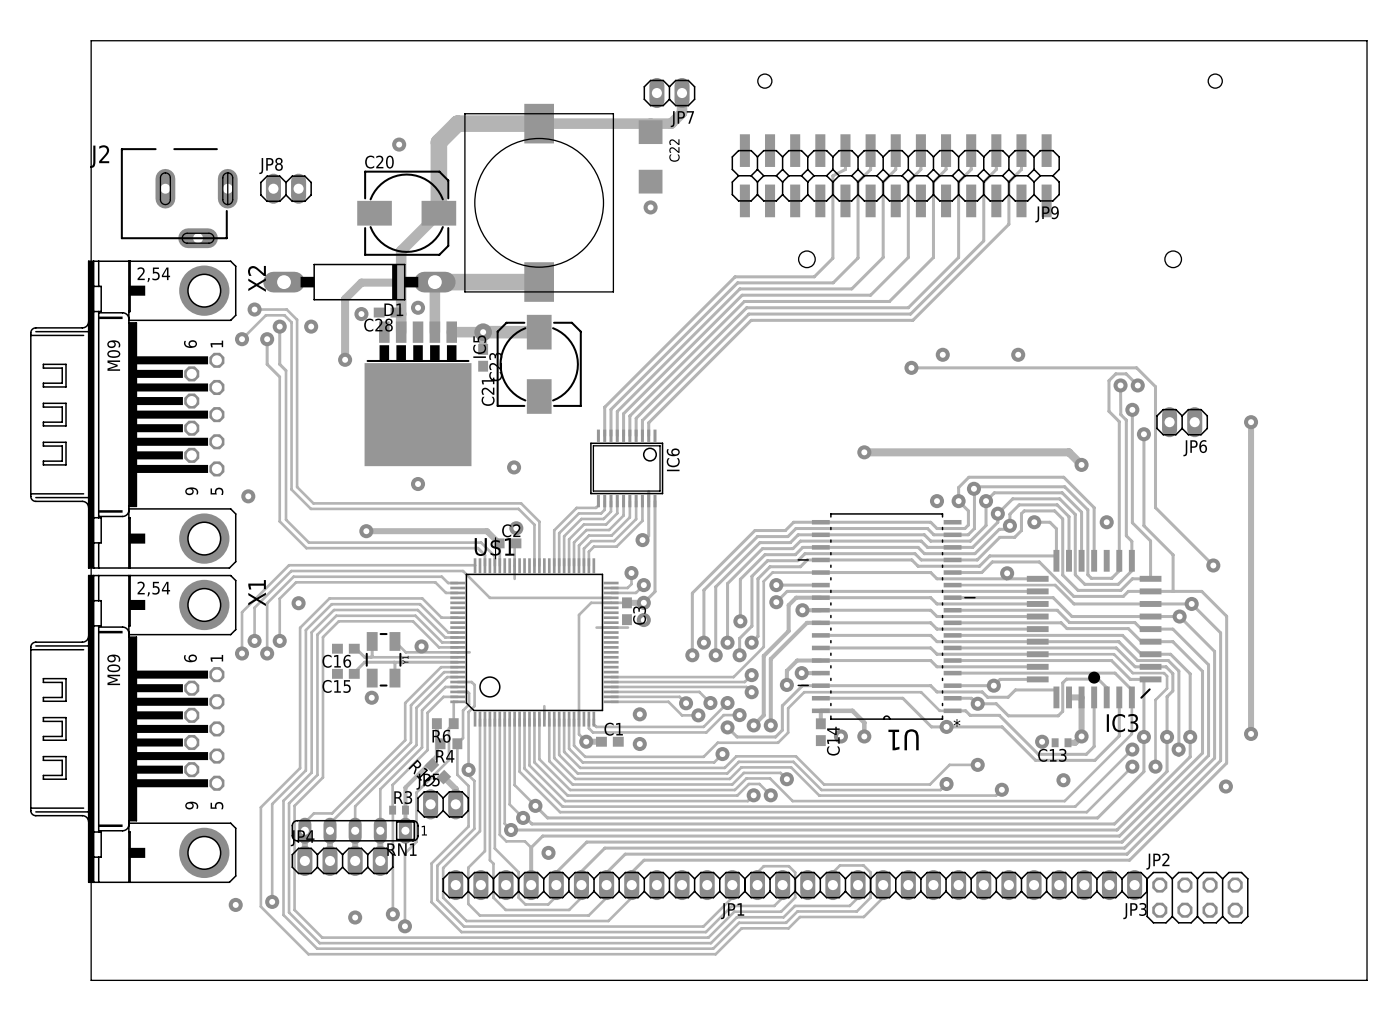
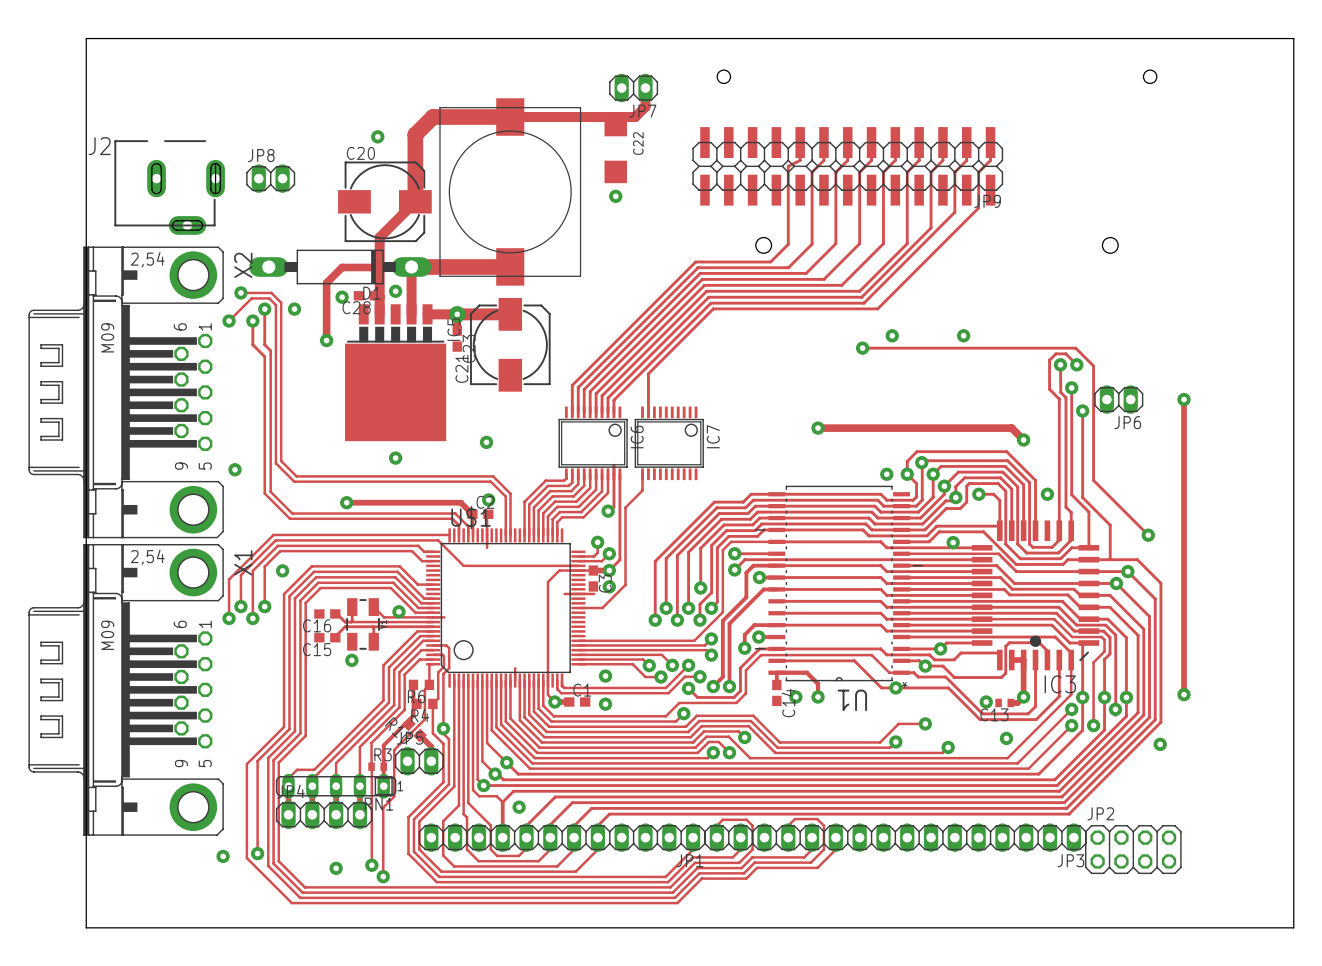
track: none -> (990, 142) (990, 160) (978, 172) (978, 207) (877, 308) (713, 308) (648, 373) (648, 412)
IC7: none -> (669, 443)
track: none -> (642, 474) (642, 490) (625, 507) (625, 584) (602, 608) (578, 608)

